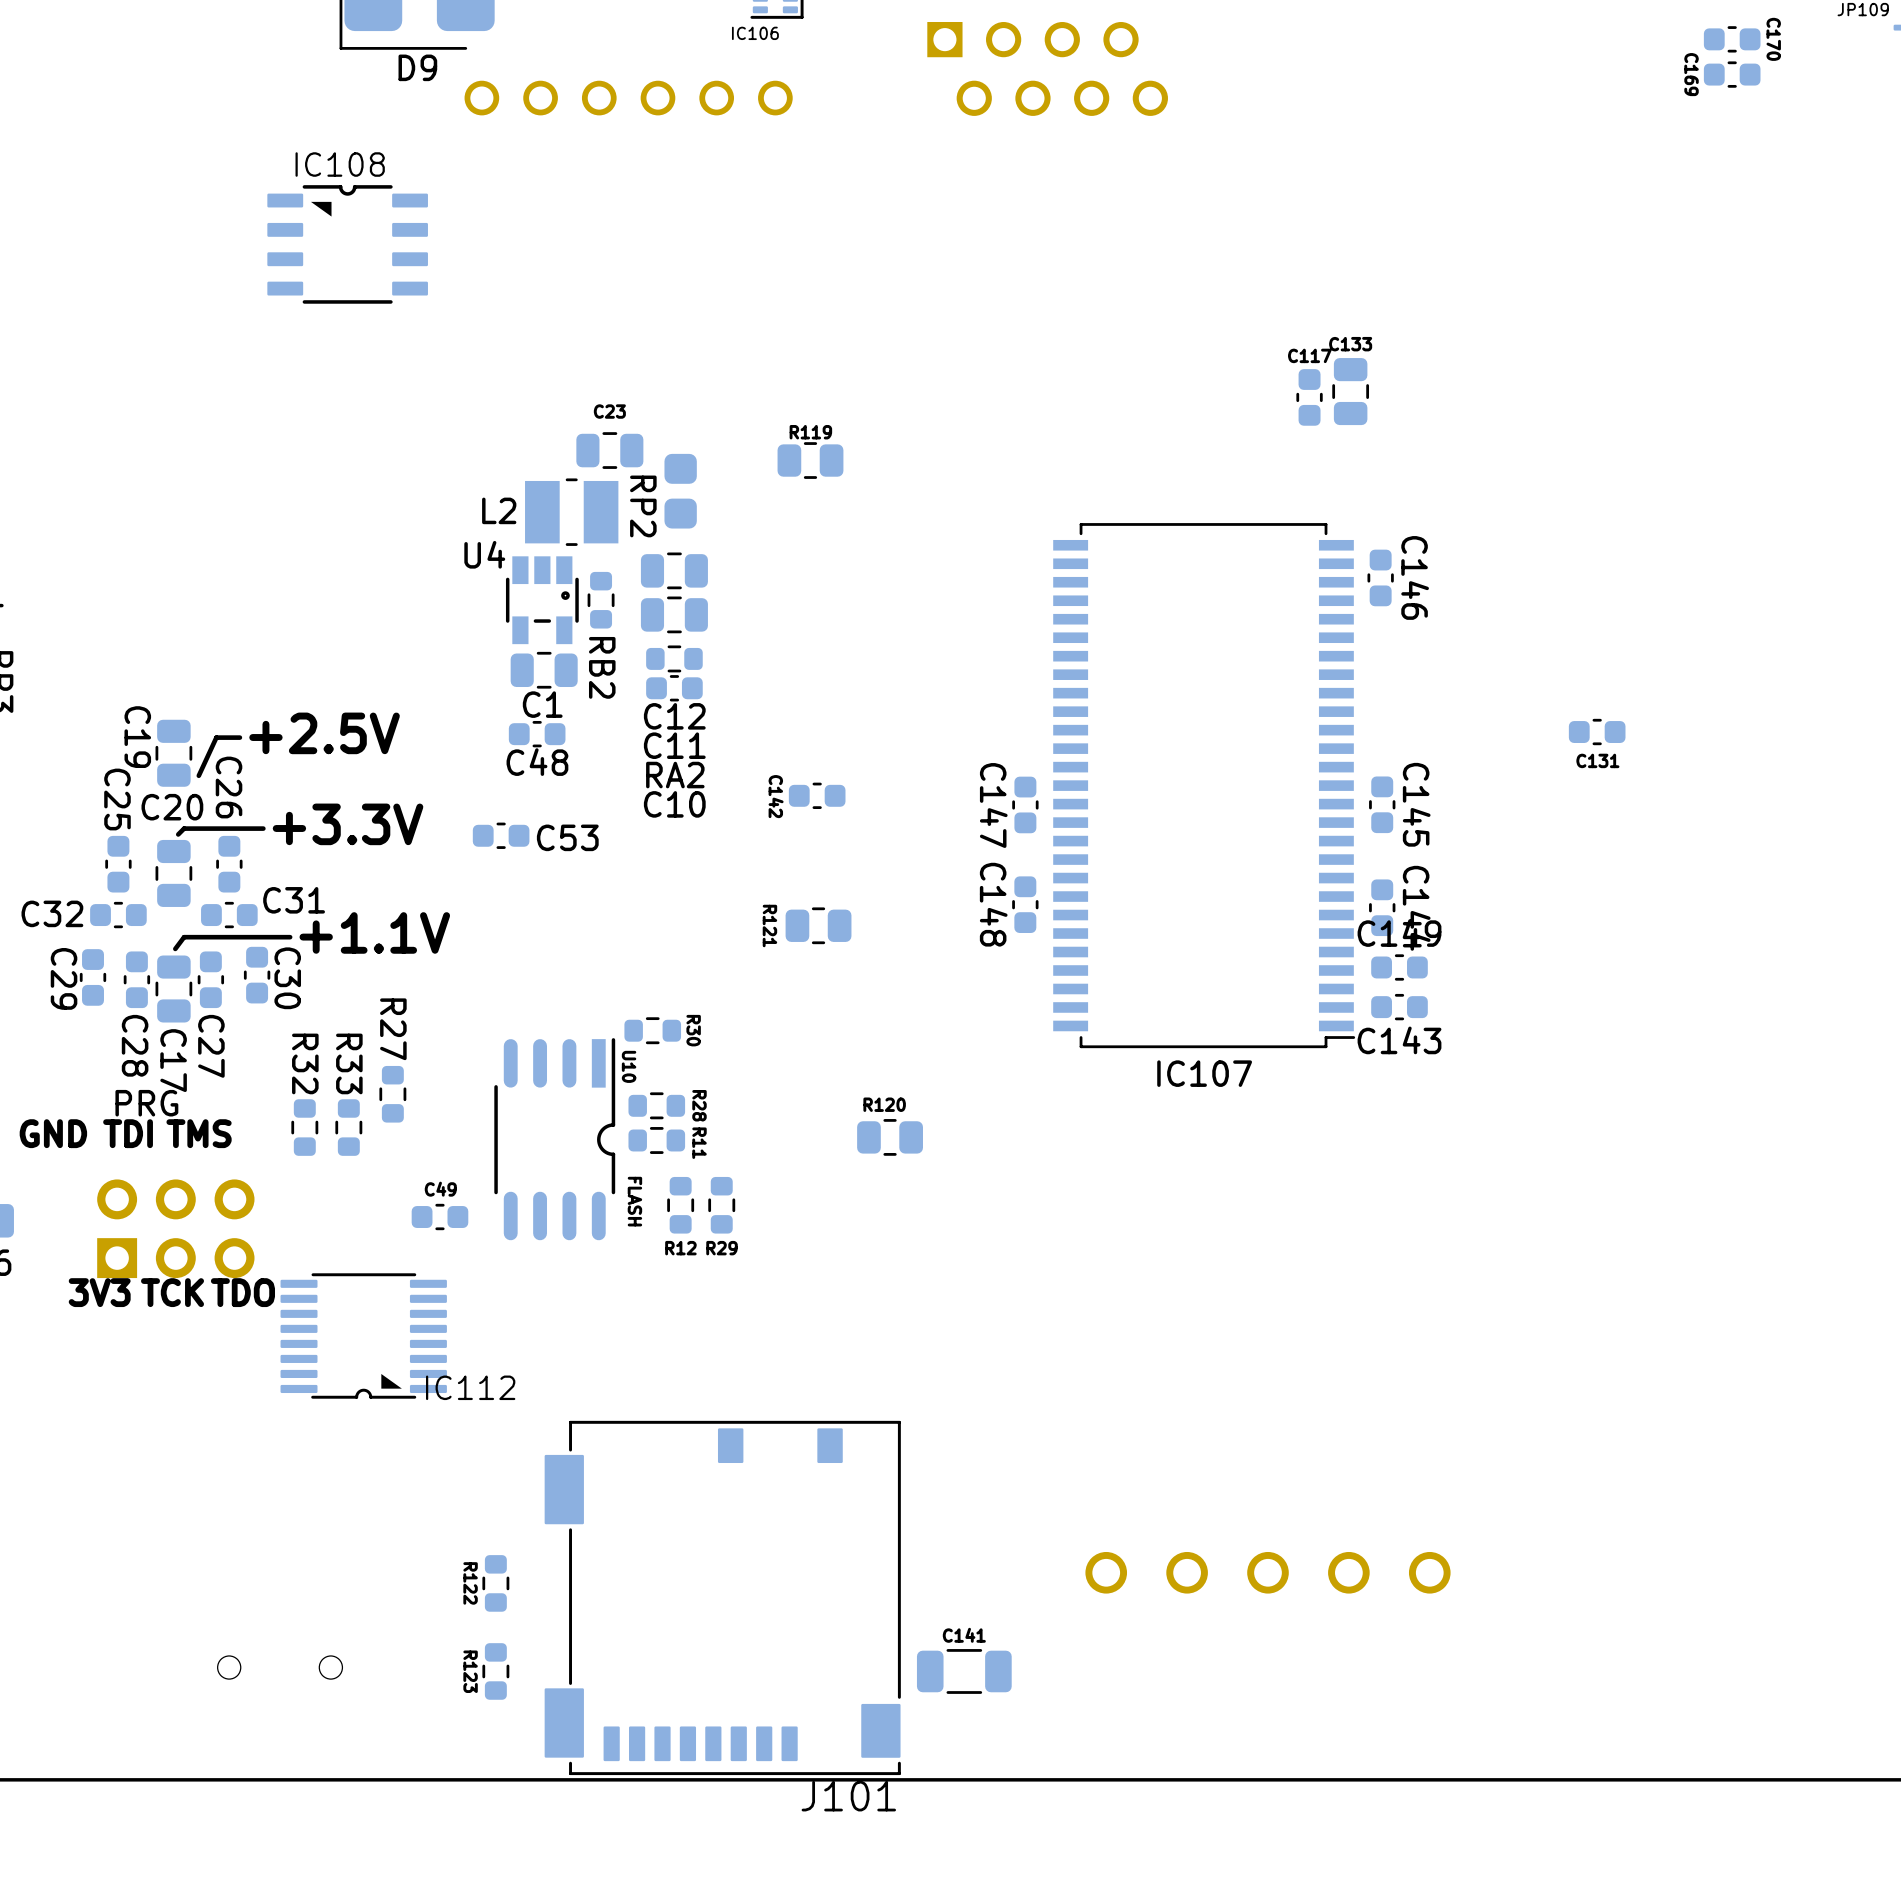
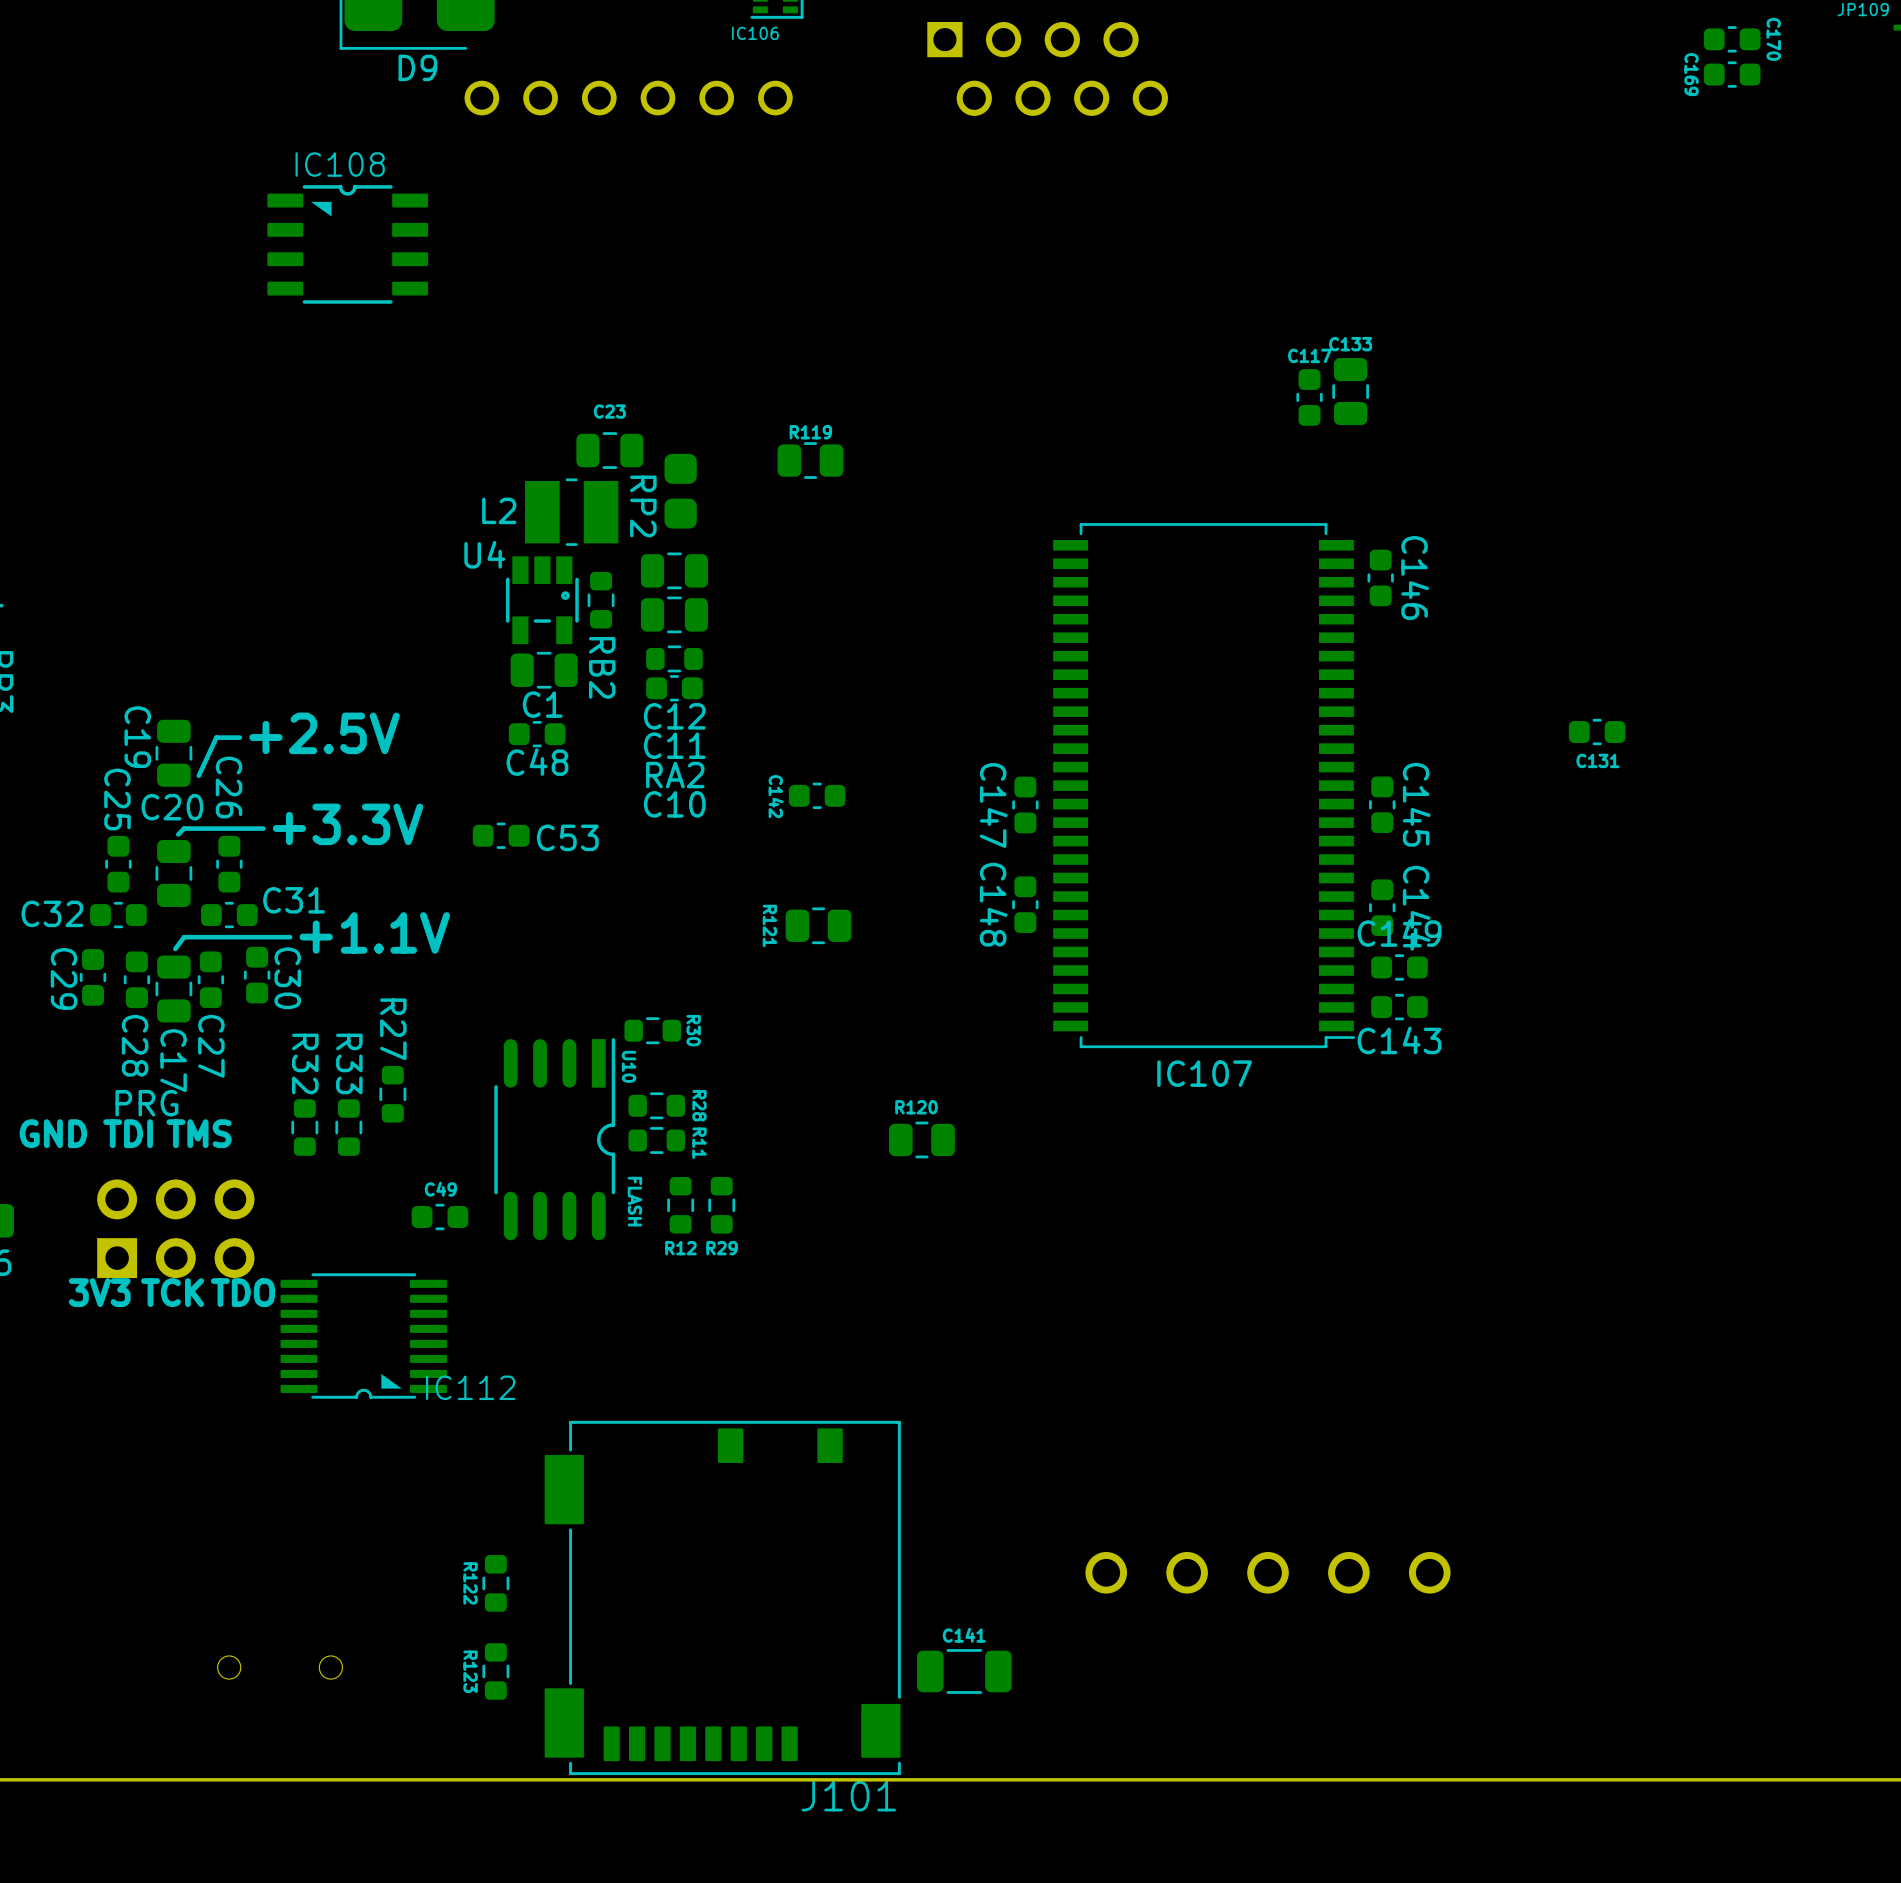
R120 position: (890, 1137) -> (921, 1139)

